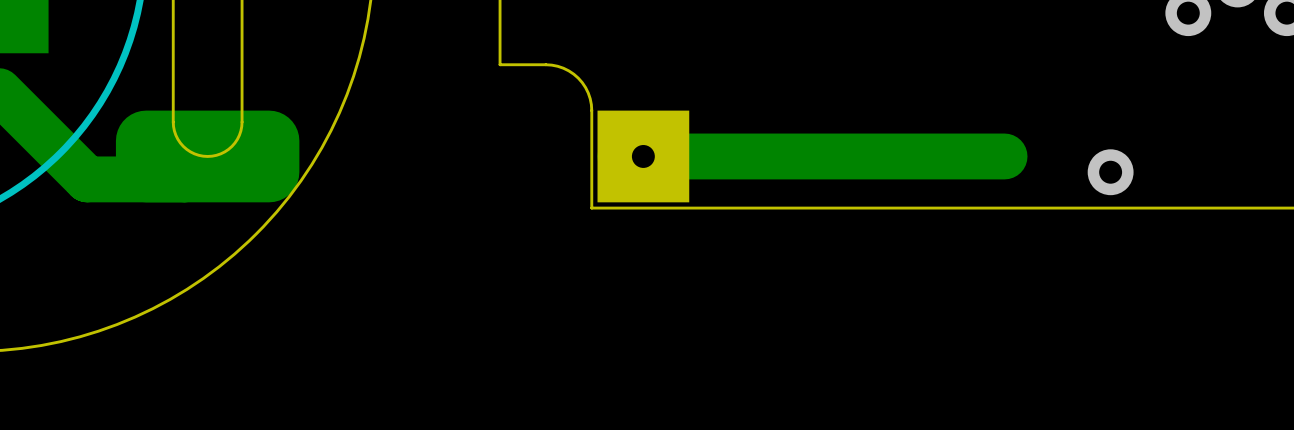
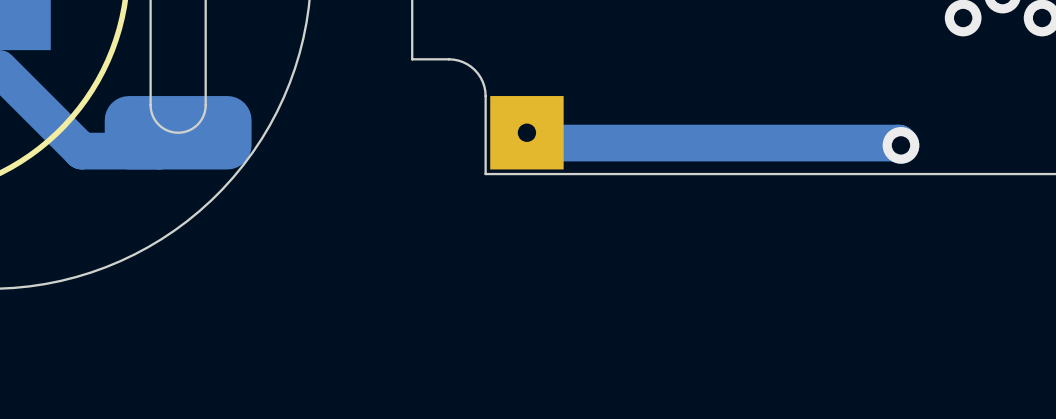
track: none -> (526, 132) (537, 143) (898, 143) (900, 145)
track: (1004, 156) (620, 156) -> none

